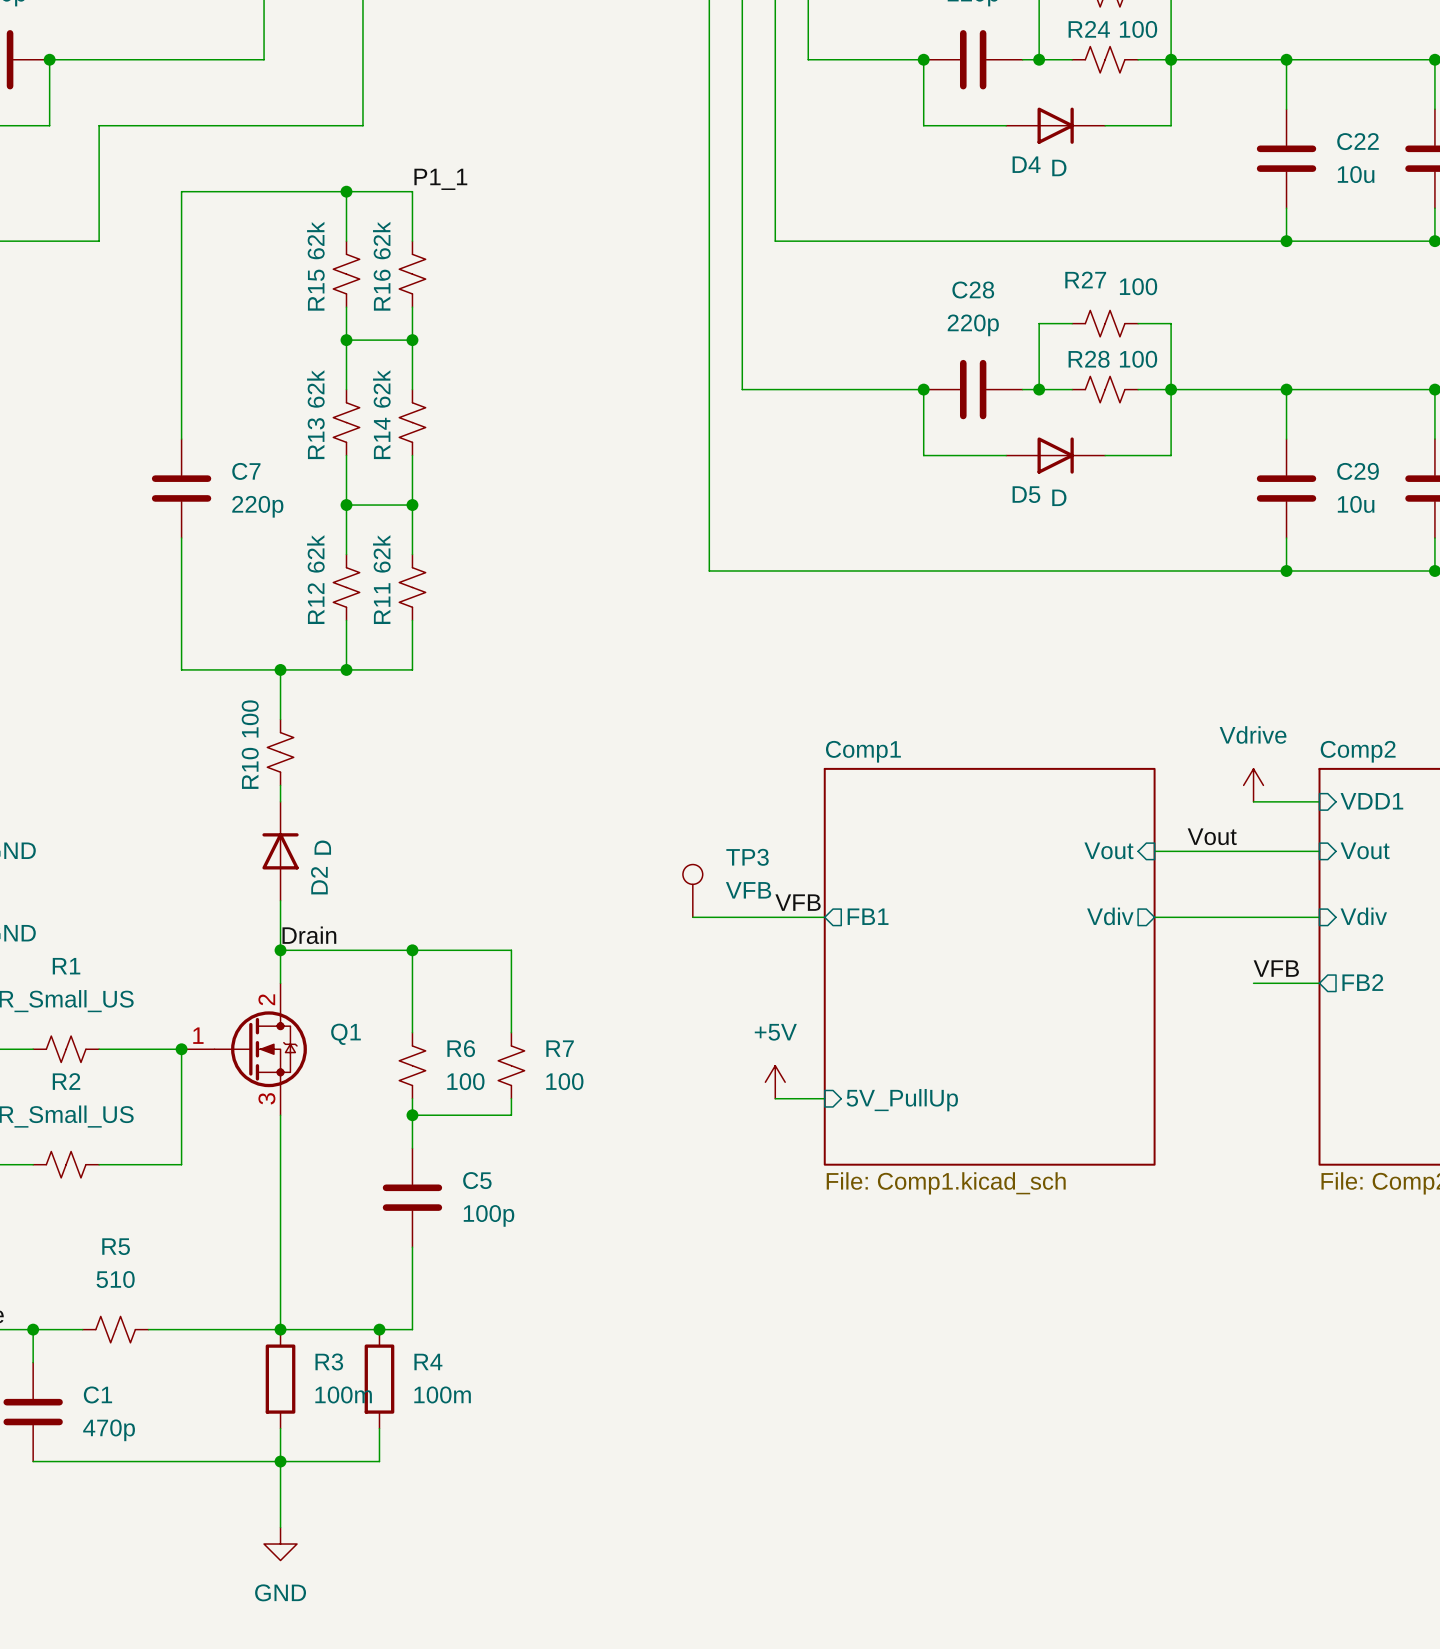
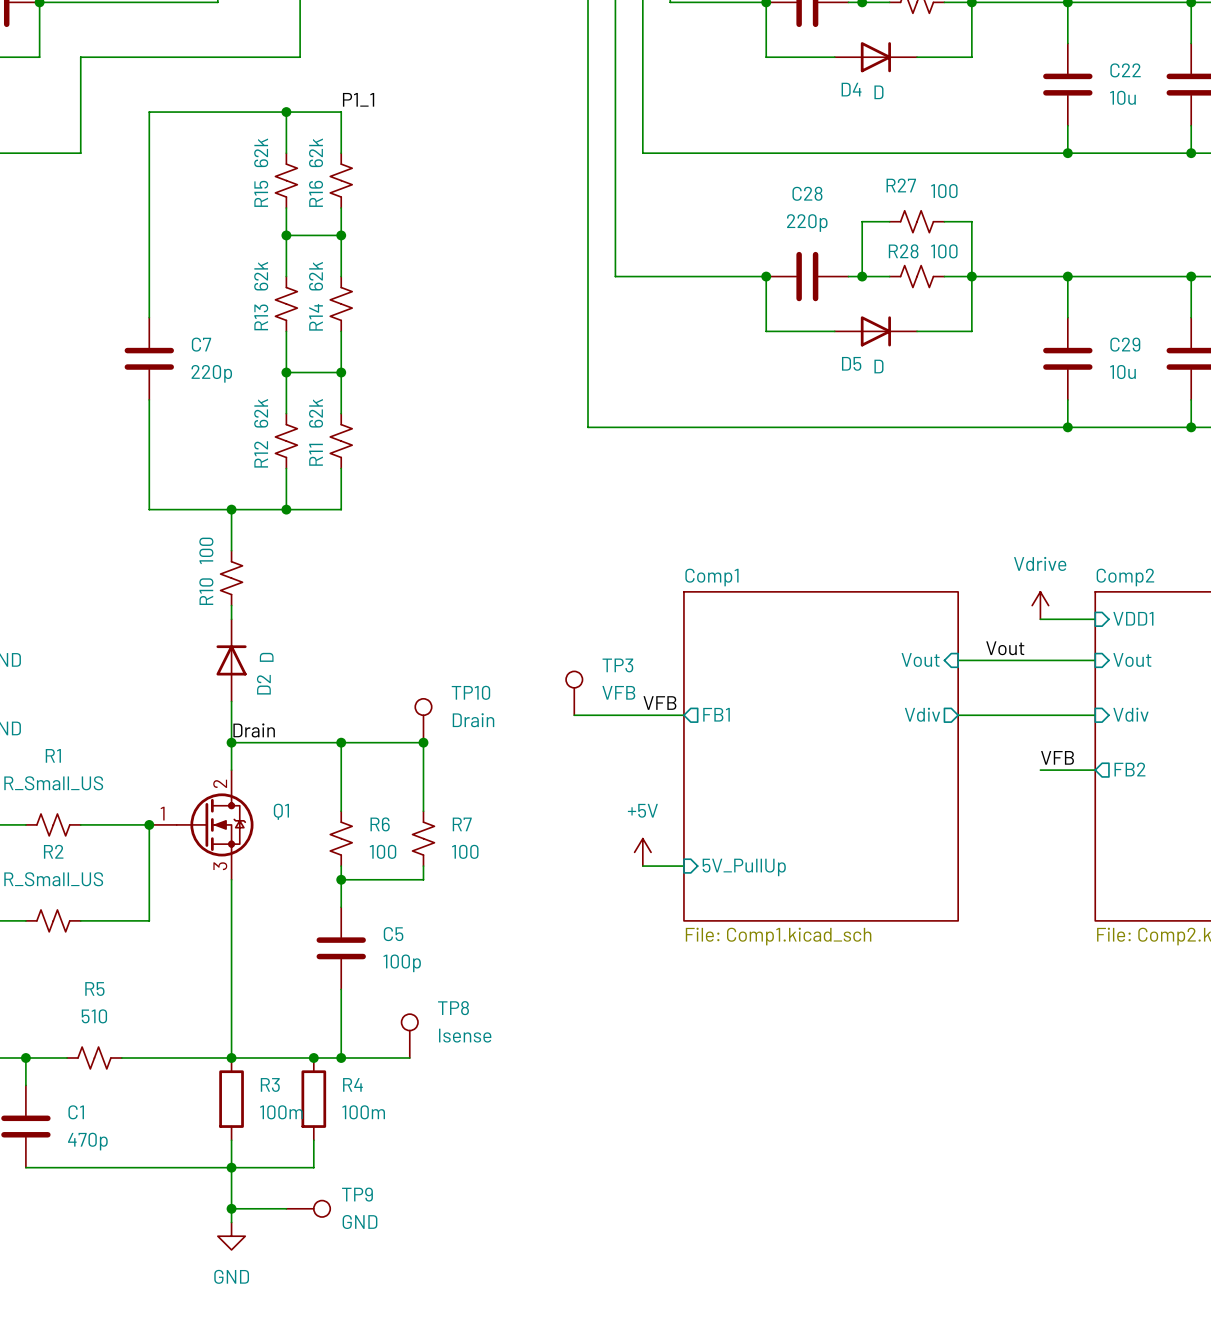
TP10: none -> Drain (423, 720)
junction: none -> (423, 742)
TP8: none -> Isense (409, 1036)
wire: none -> (341, 1057) (409, 1057)
junction: none -> (341, 1057)
wire: none -> (231, 1208) (286, 1208)
junction: none -> (231, 1208)
TP9: none -> GND (308, 1208)

